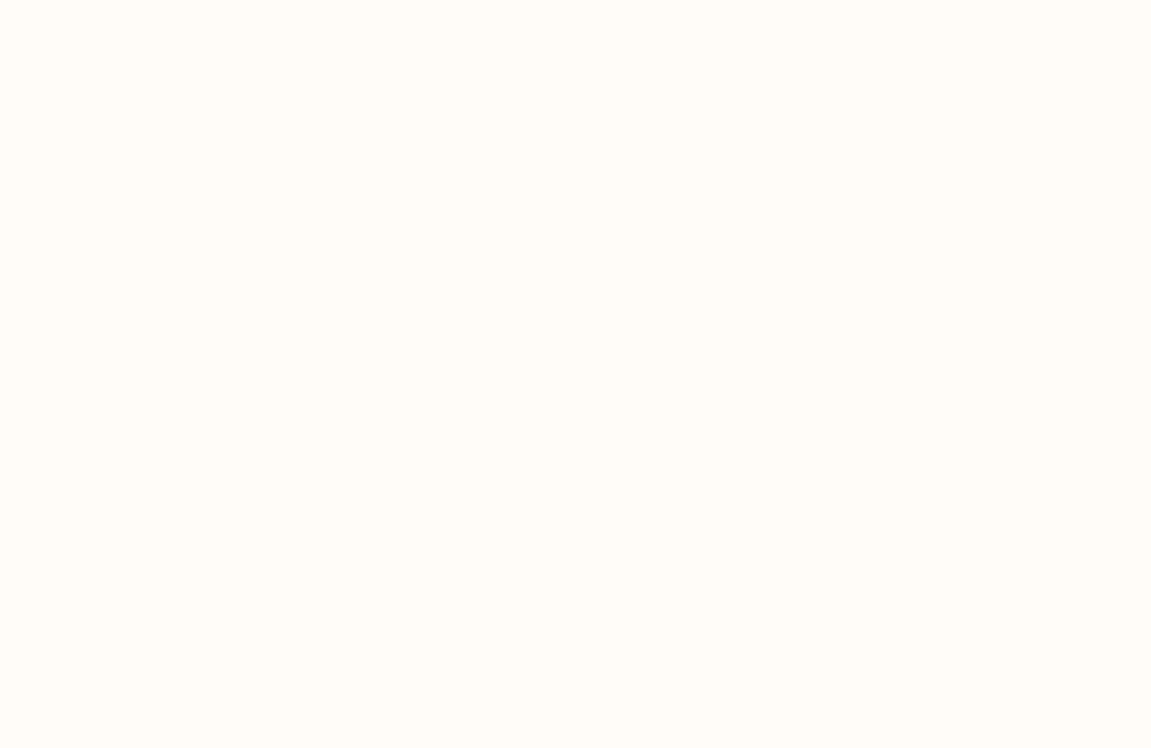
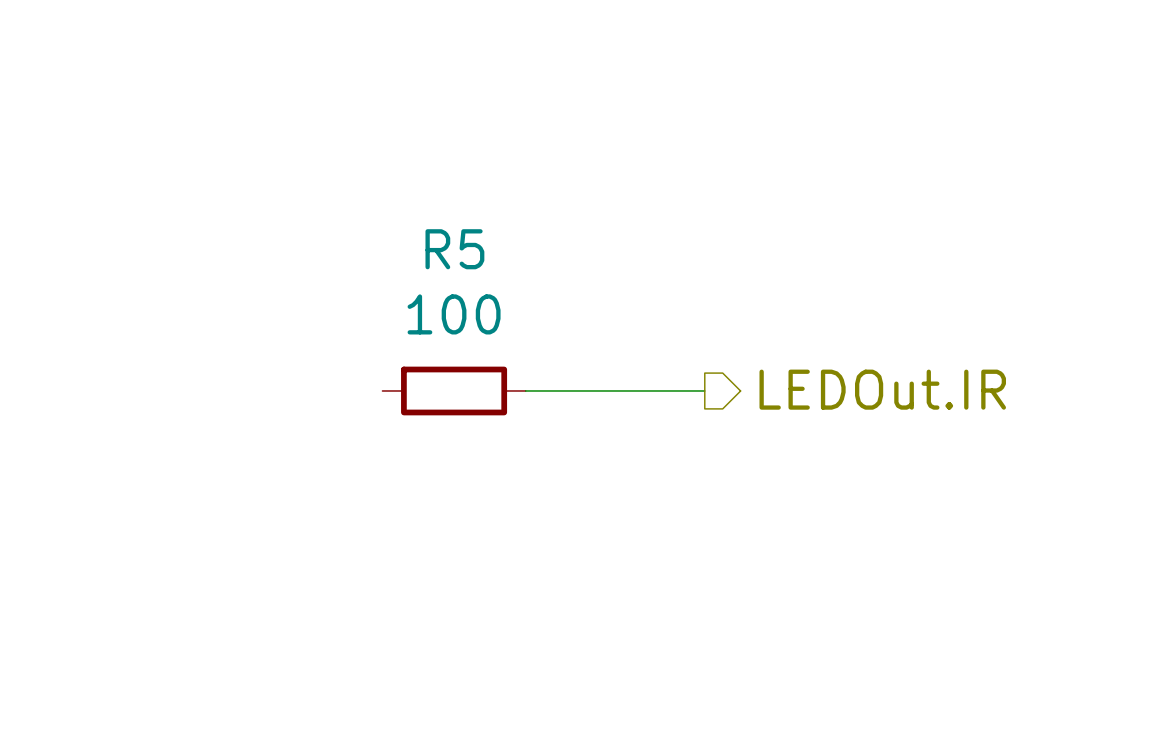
hierarchical label: none -> LEDOut.IR (882, 389)
R5: none -> 100 (454, 390)
wire: none -> (525, 390) (704, 390)

